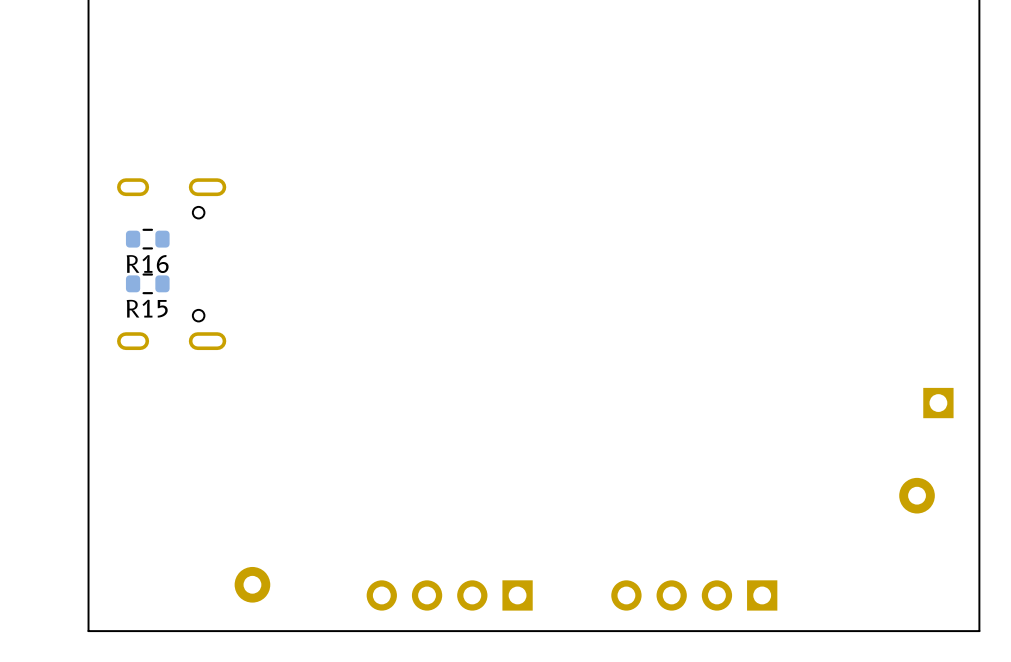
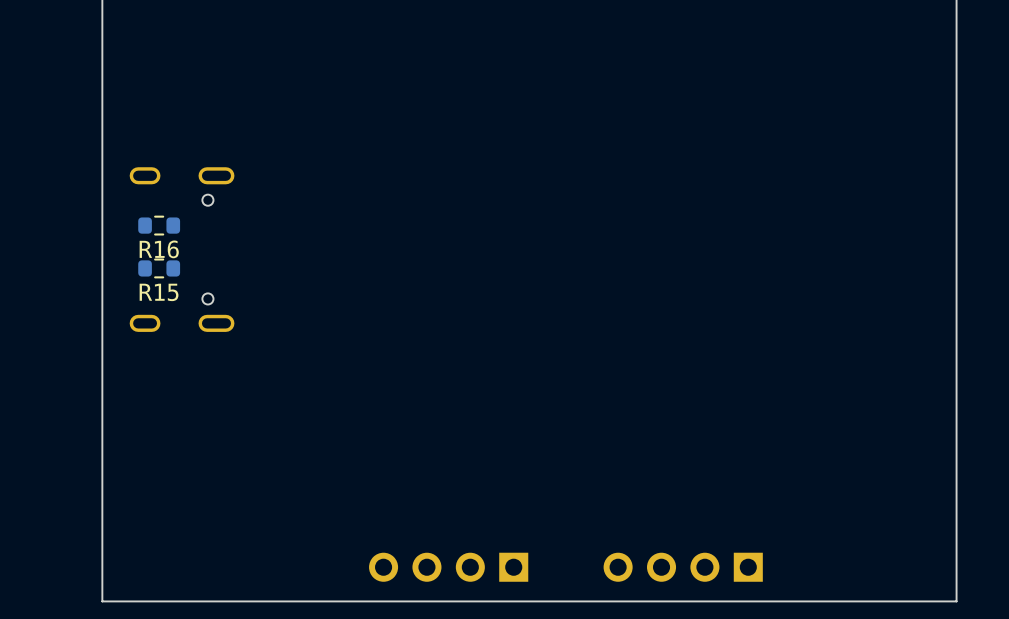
part: (938, 403) -> none
part: (917, 495) -> none
part: (252, 584) -> none

